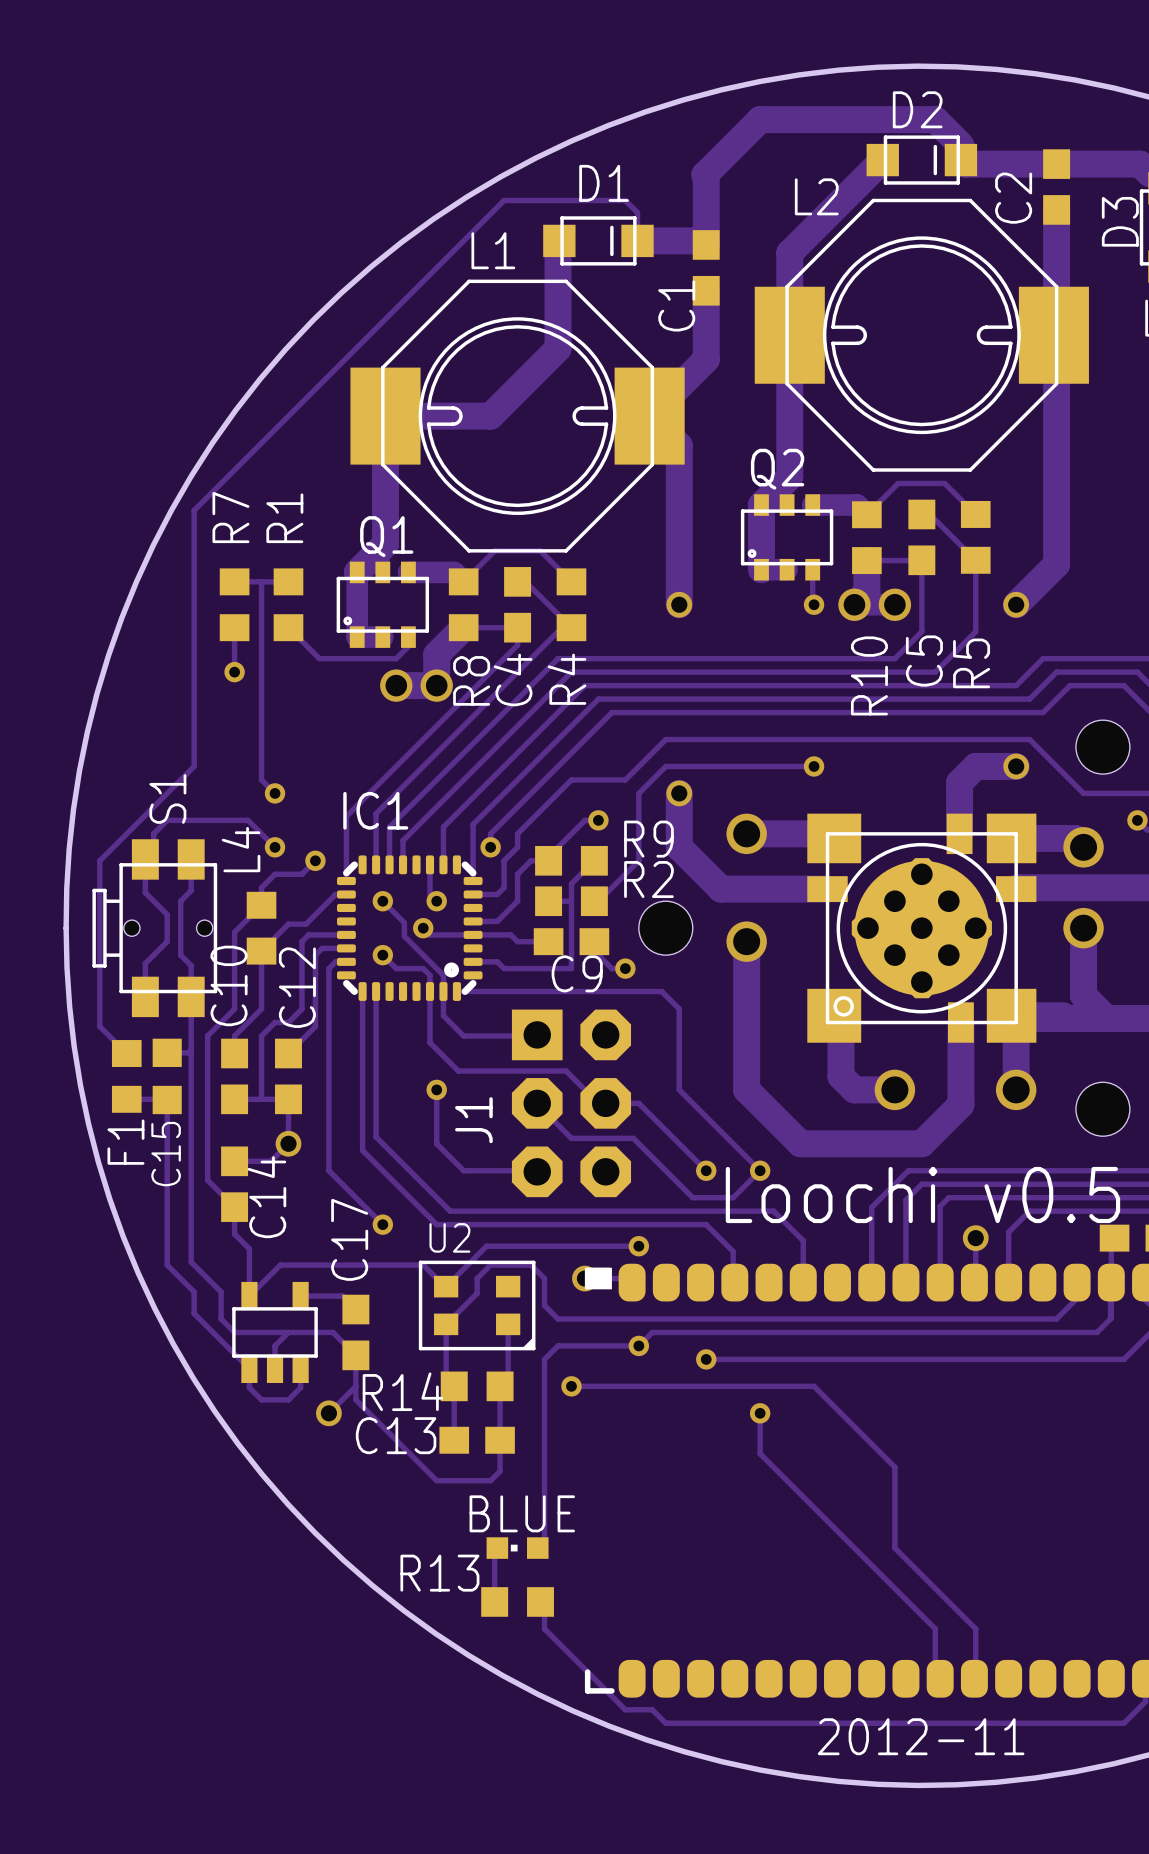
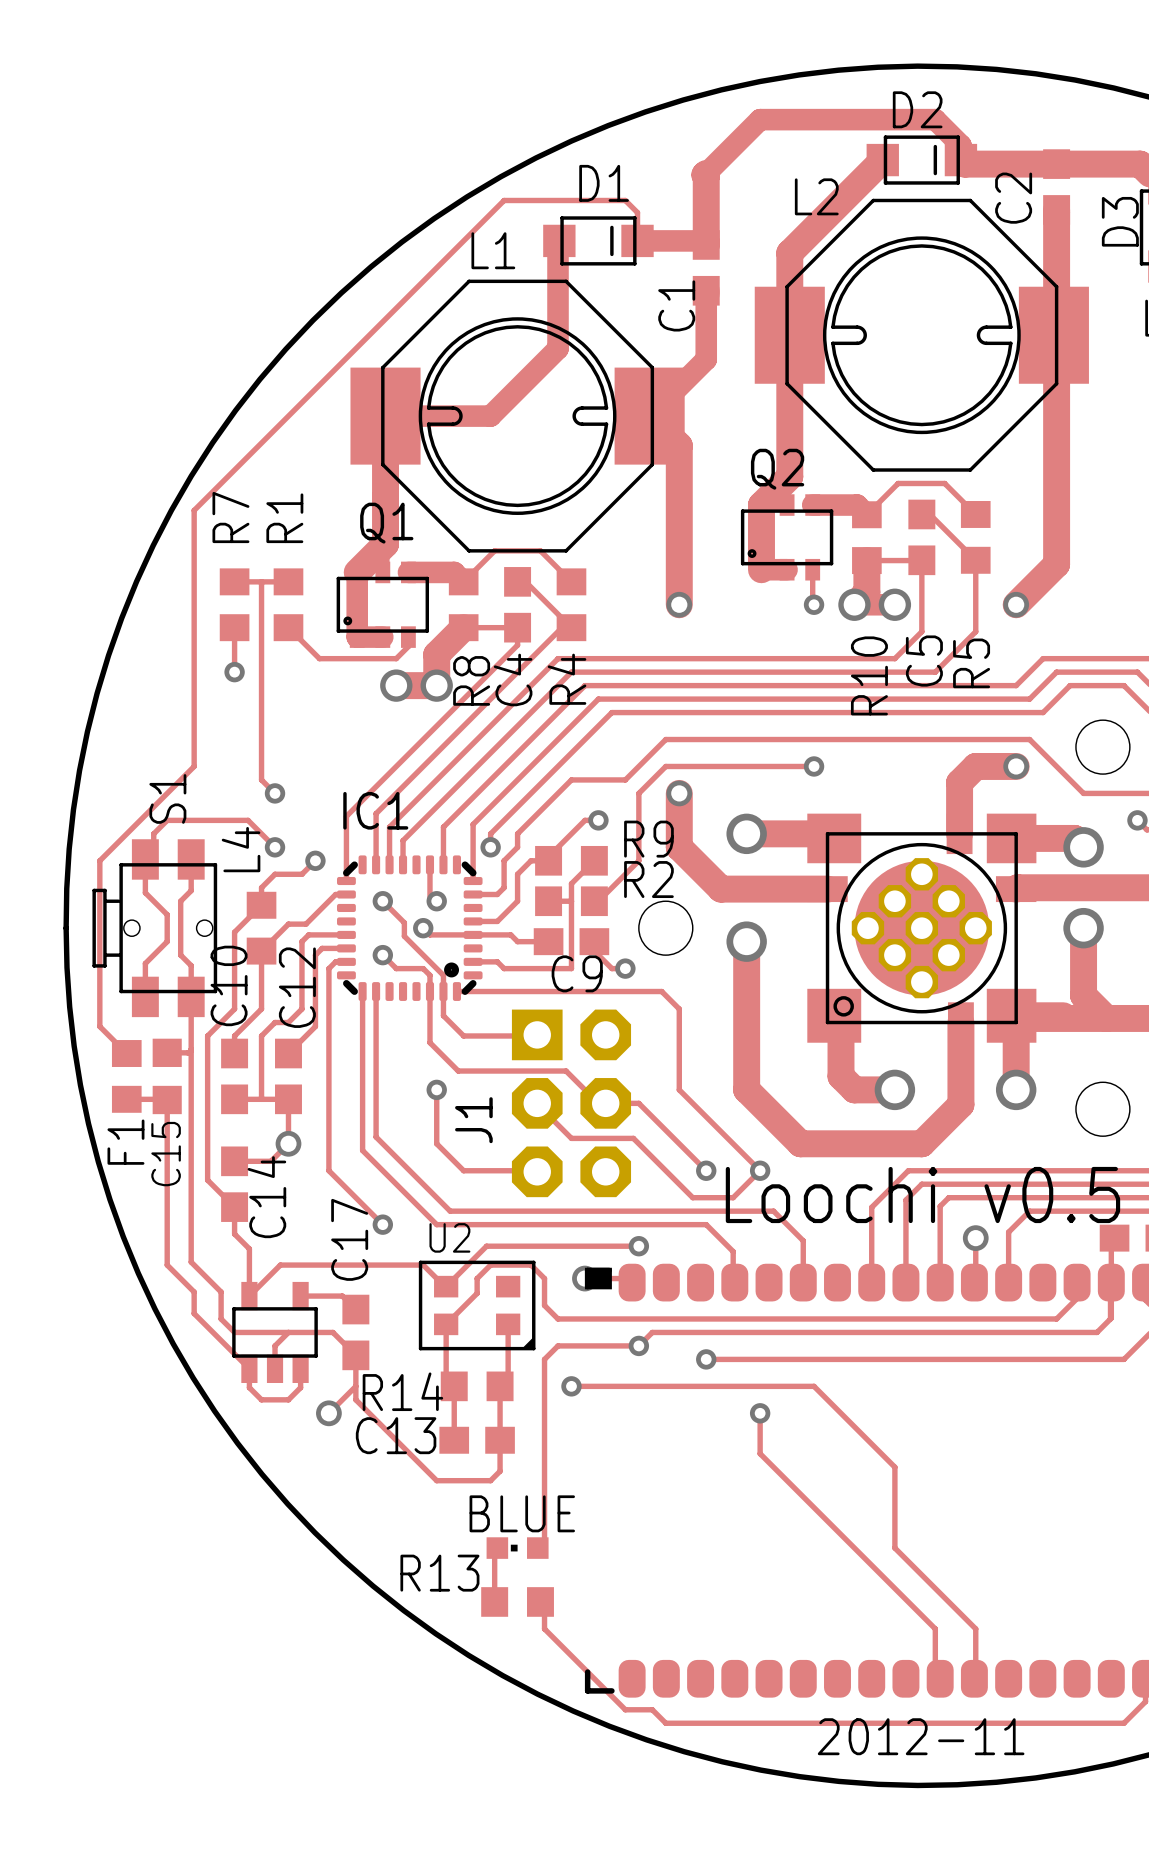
track width: thick (960, 145) (935, 119) (760, 119) (706, 173) -> thin (960, 145) (935, 119) (760, 119) (706, 173)
track width: thick (637, 240) (702, 240) -> thin (637, 240) (702, 240)
track width: thick (558, 242) (558, 348) (490, 416) (385, 416) -> thin (558, 242) (558, 348) (490, 416) (385, 416)
track width: thick (706, 293) (706, 359) (652, 413) -> thin (706, 293) (706, 359) (652, 413)
Q1 name position: Q1 (386, 536) -> Q1 (386, 523)

